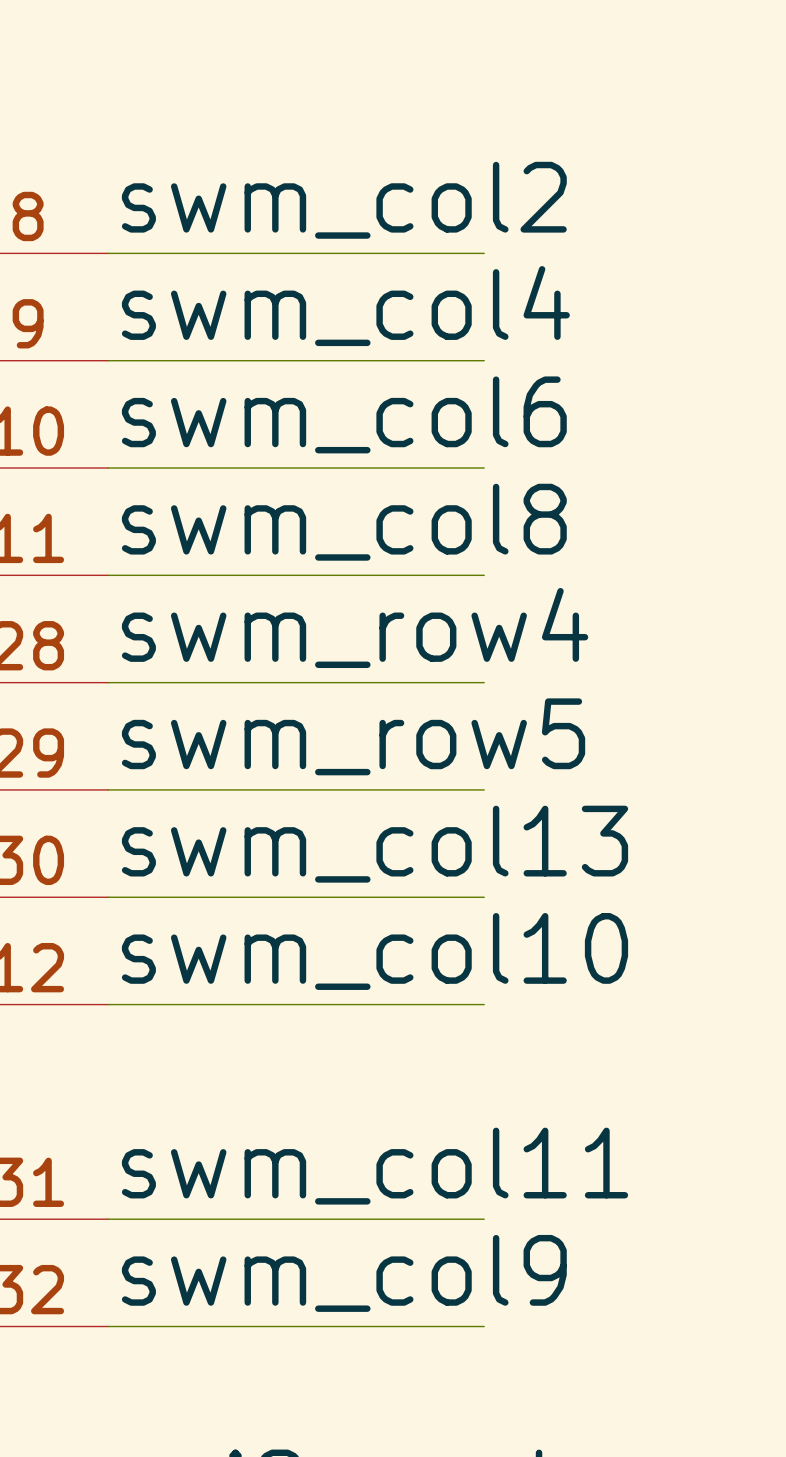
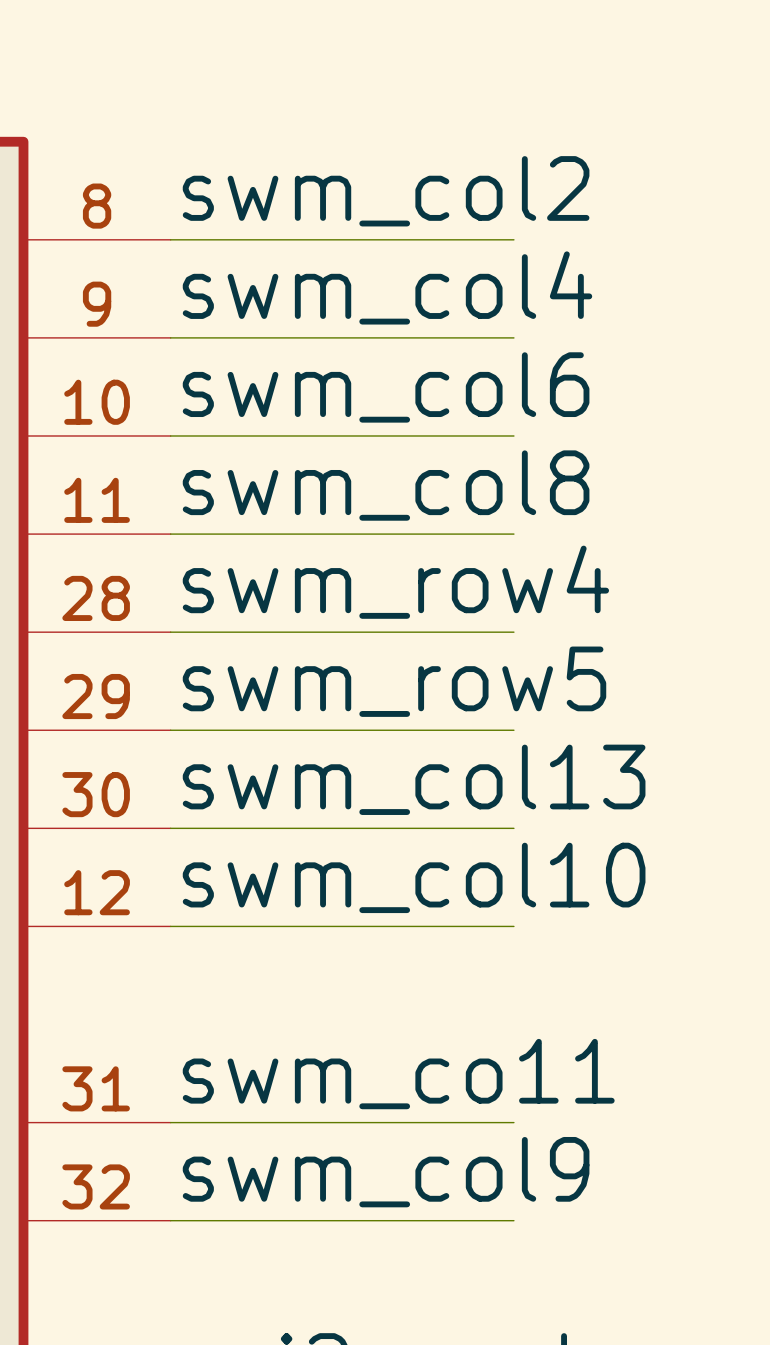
label: swm_col11 (375, 1166) -> swm_co11 (398, 1074)

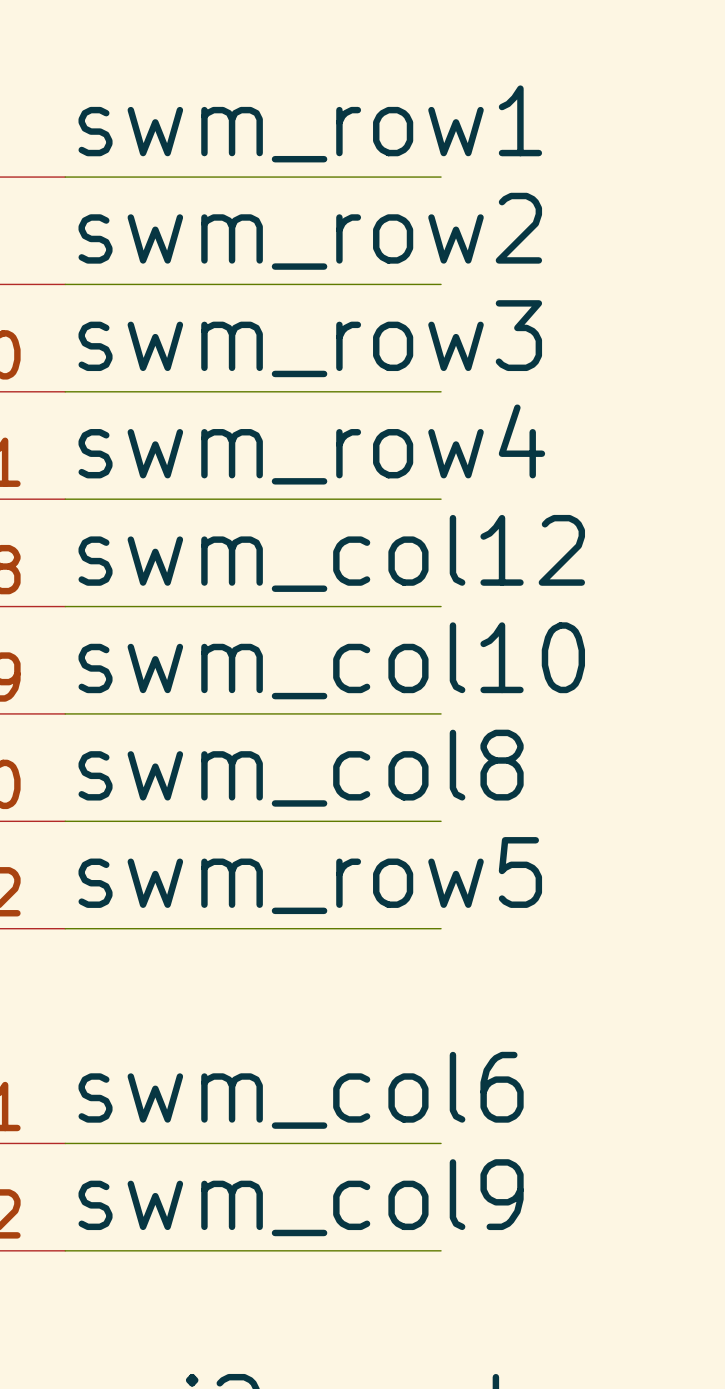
label: swm_col2 (386, 191) -> swm_row1 (310, 123)
label: swm_col4 (387, 287) -> swm_row2 (310, 231)
label: swm_col6 (386, 387) -> swm_row3 (310, 338)
label: swm_col8 (386, 485) -> swm_row4 (311, 444)
label: swm_row4 (395, 582) -> swm_col12 (331, 553)
label: swm_row5 (394, 681) -> swm_col10 (331, 660)
label: swm_col13 (414, 779) -> swm_col8 (301, 768)
label: swm_col10 (414, 877) -> swm_row5 (310, 875)
label: swm_co11 (398, 1074) -> swm_col6 (301, 1090)

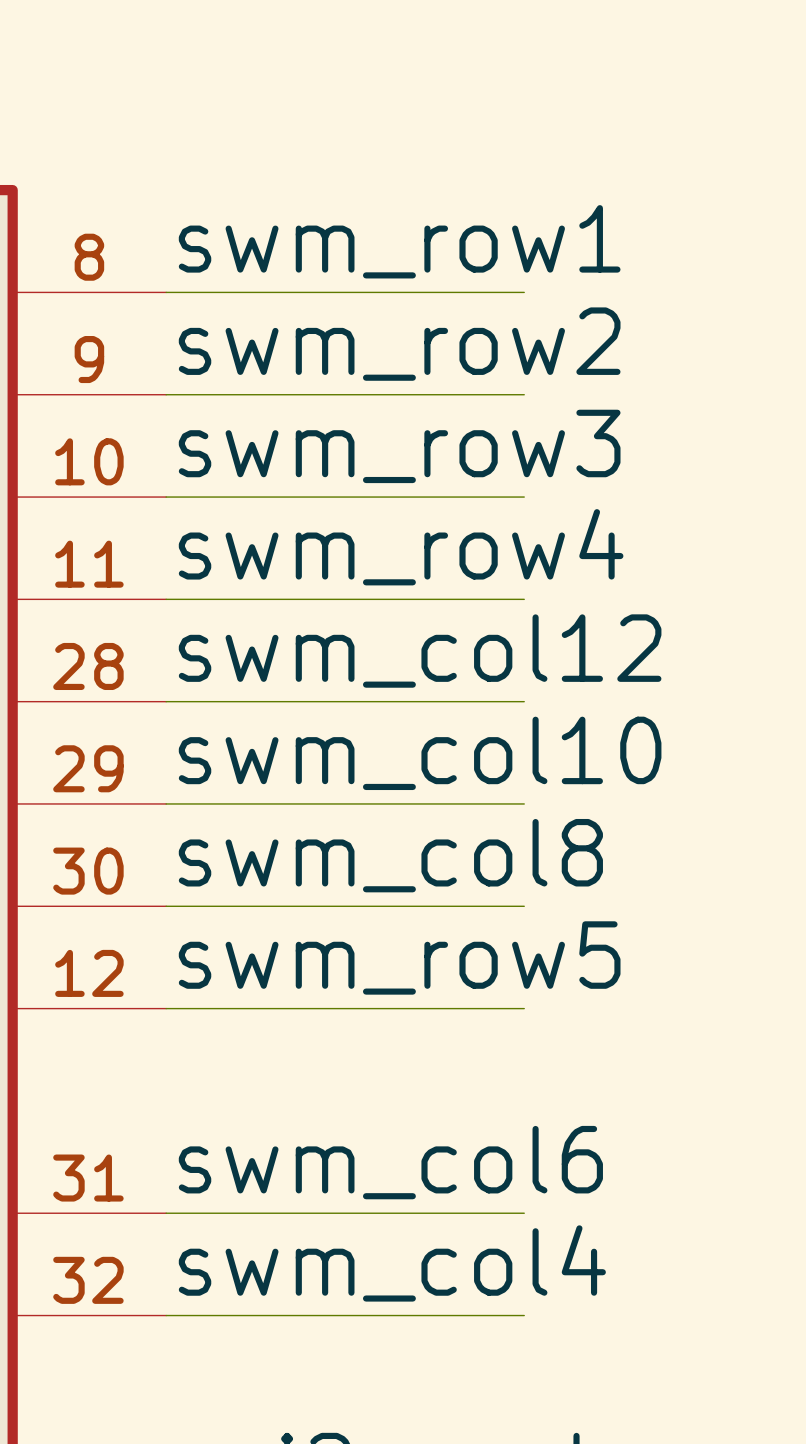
label: swm_col9 (301, 1197) -> swm_col4 (392, 1263)

